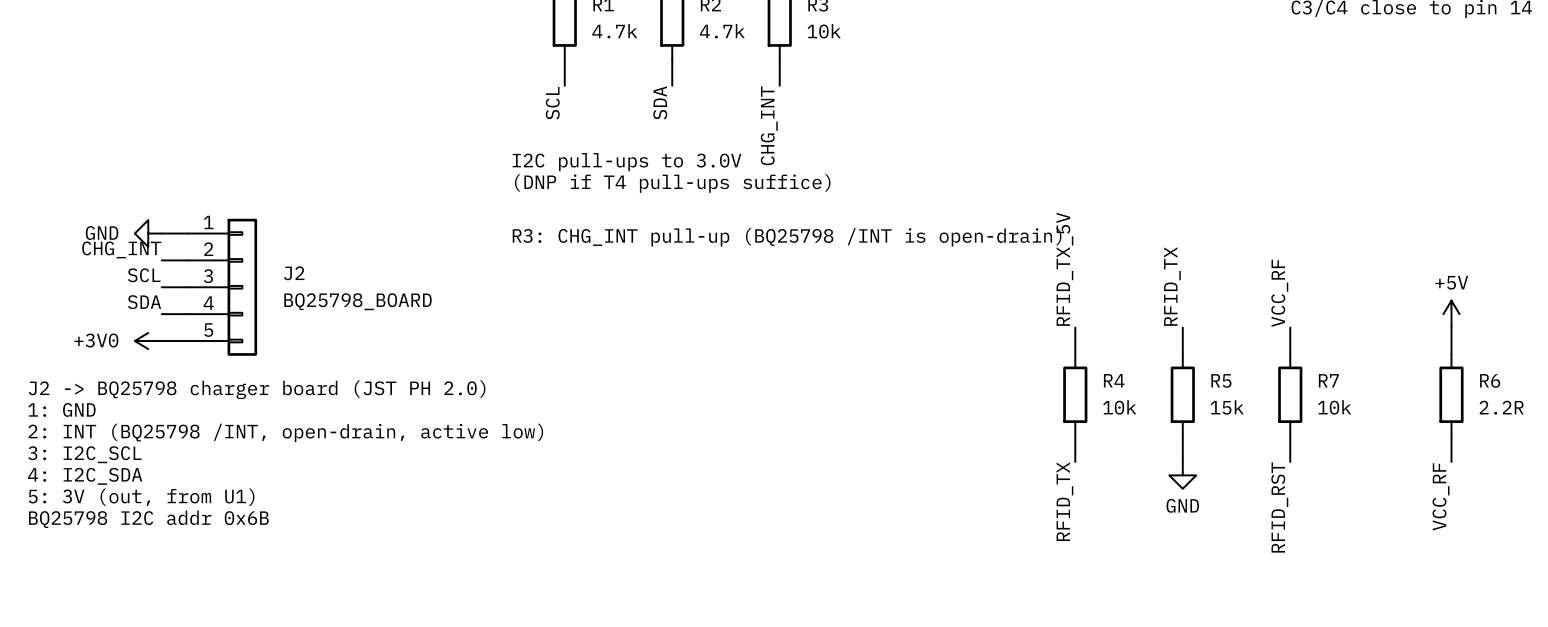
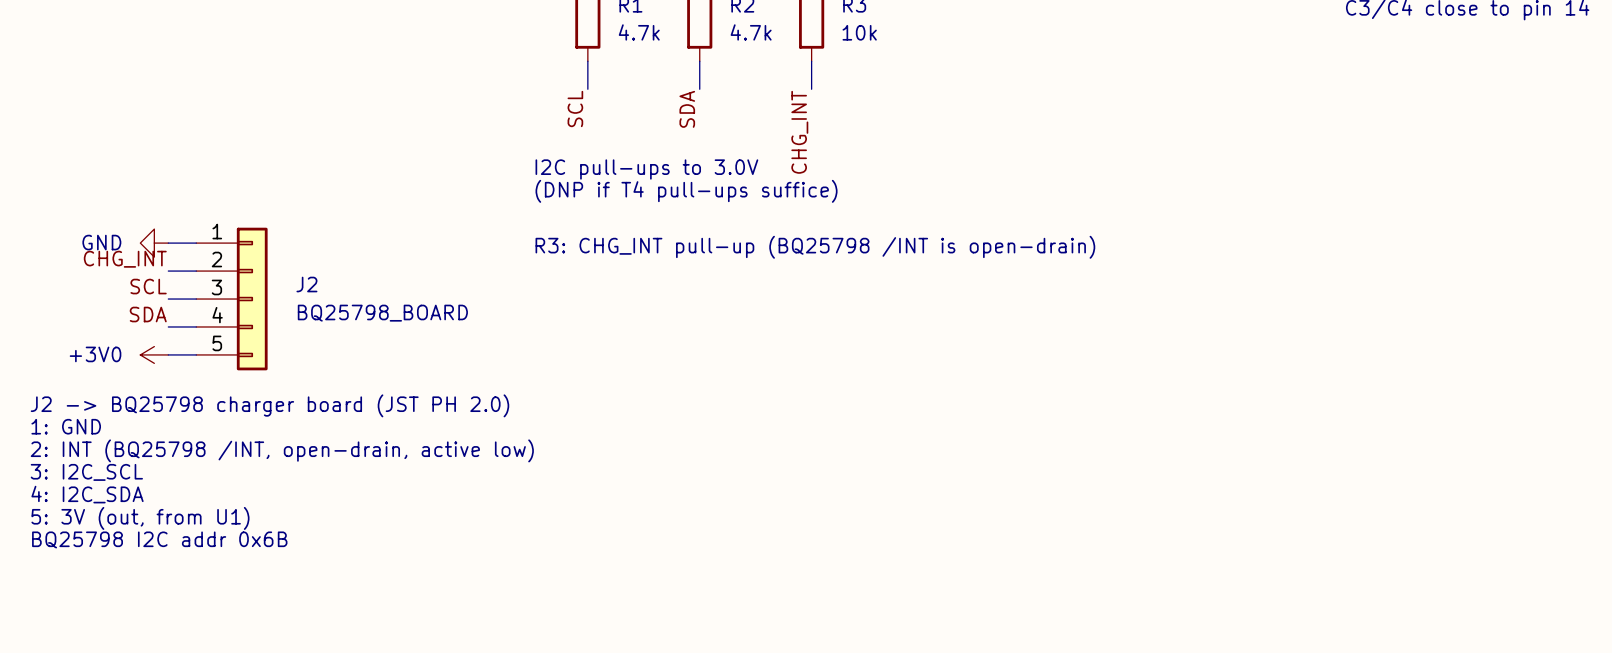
label: RFID_TX_5V (1064, 269) -> none
label: RFID_TX (1172, 286) -> none
label: VCC_RF (1279, 293) -> none
power symbol: +5V (1451, 314) -> none
wire: (1075, 327) (1075, 354) -> none
wire: (1182, 327) (1182, 354) -> none
wire: (1290, 327) (1290, 354) -> none
wire: (1451, 327) (1451, 354) -> none
R4: 10k (1075, 394) -> none
R5: 15k (1182, 394) -> none
R7: 10k (1290, 394) -> none
R6: 2.2R (1451, 394) -> none
wire: (1075, 435) (1075, 461) -> none
wire: (1182, 435) (1182, 461) -> none
wire: (1290, 435) (1290, 461) -> none
wire: (1451, 435) (1451, 461) -> none
power symbol: GND (1182, 475) -> none
label: VCC_RF (1441, 496) -> none
label: RFID_TX (1064, 501) -> none
label: RFID_RST (1279, 507) -> none

